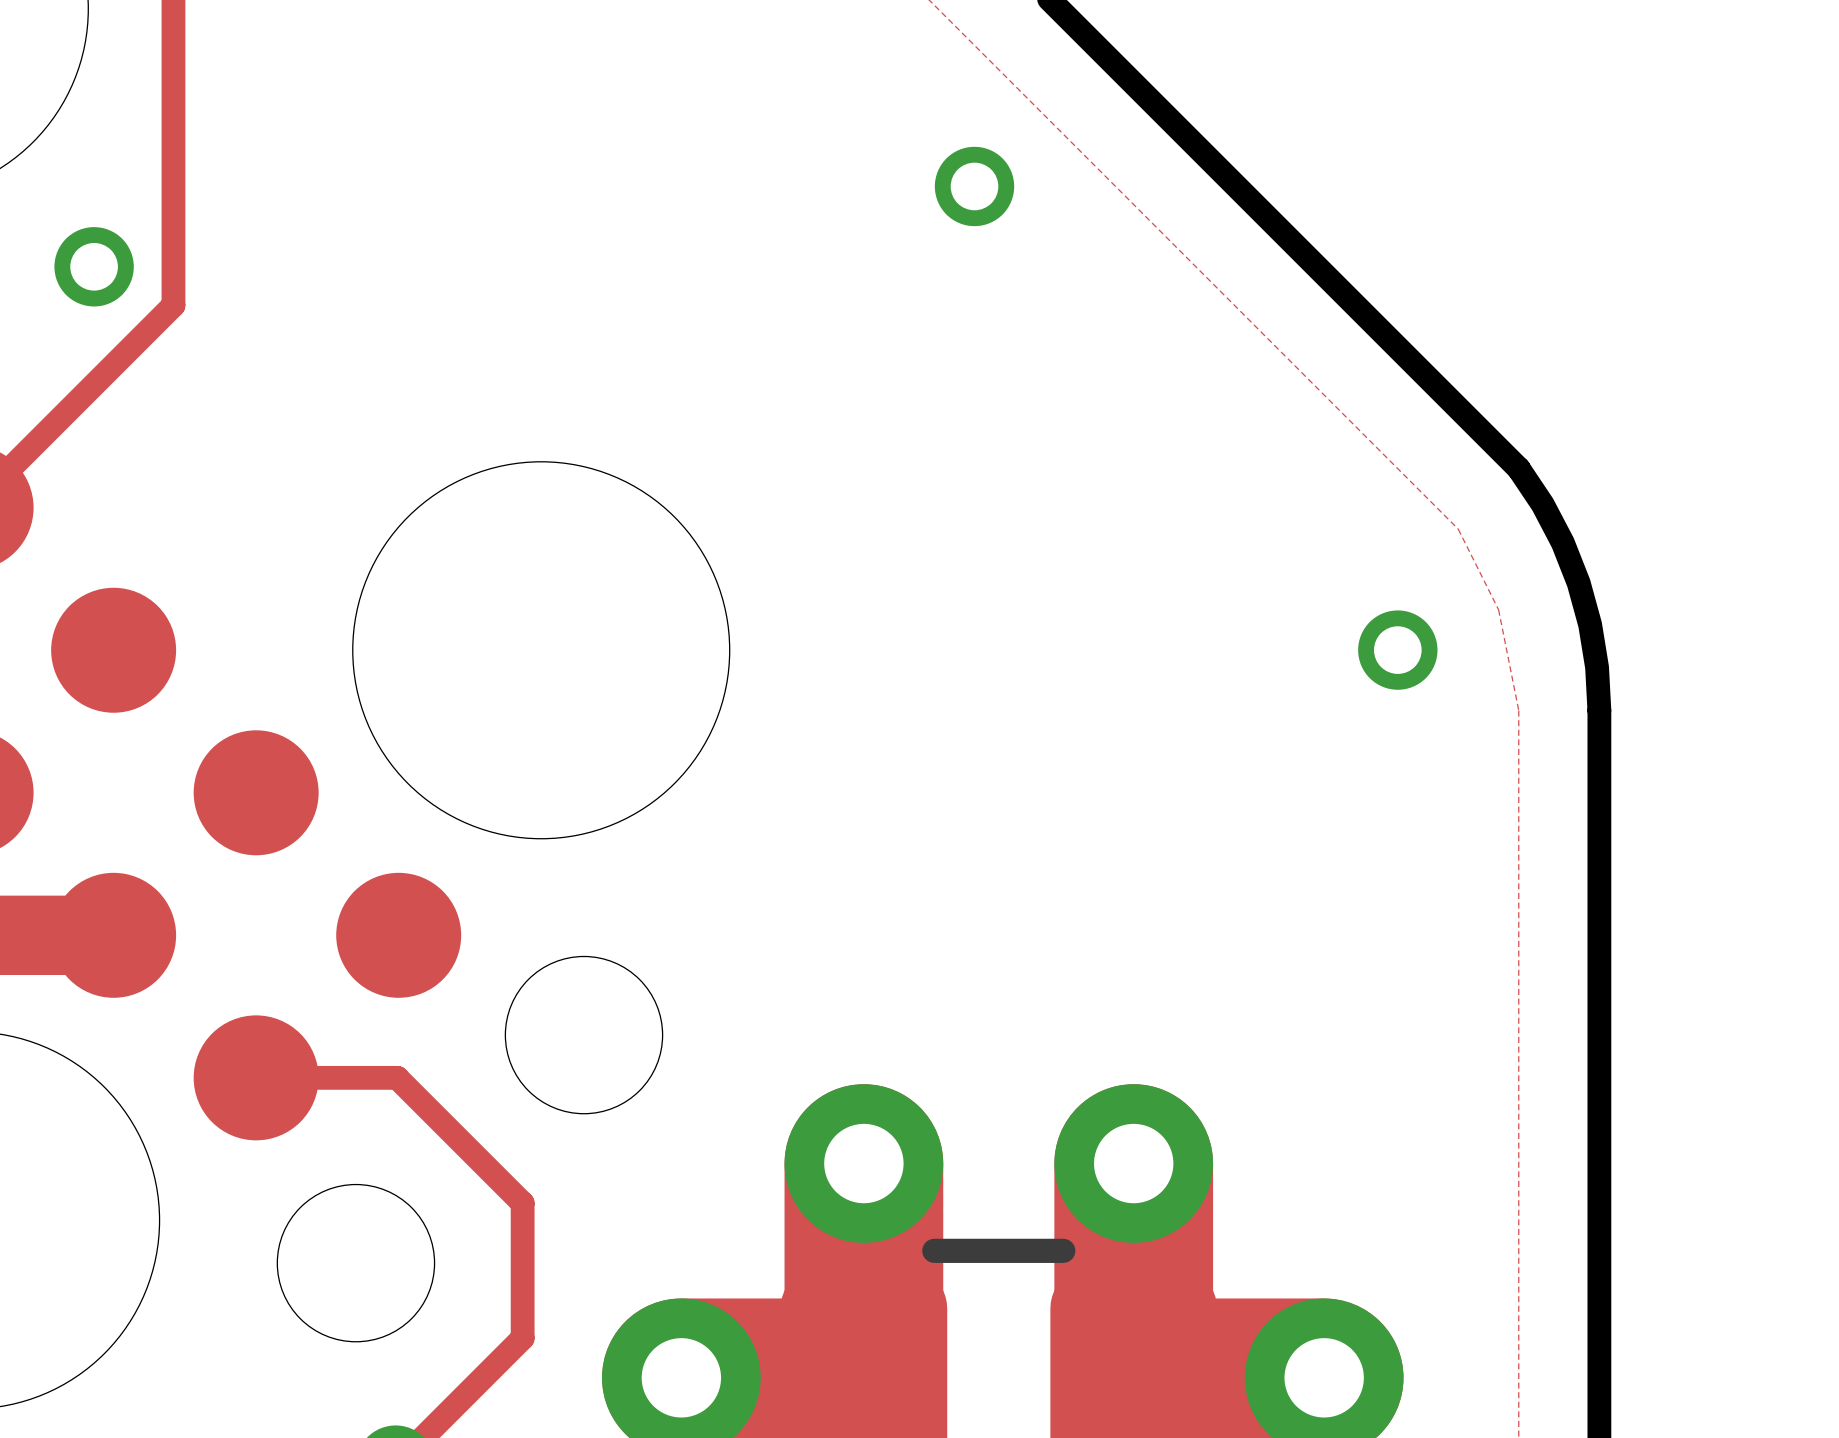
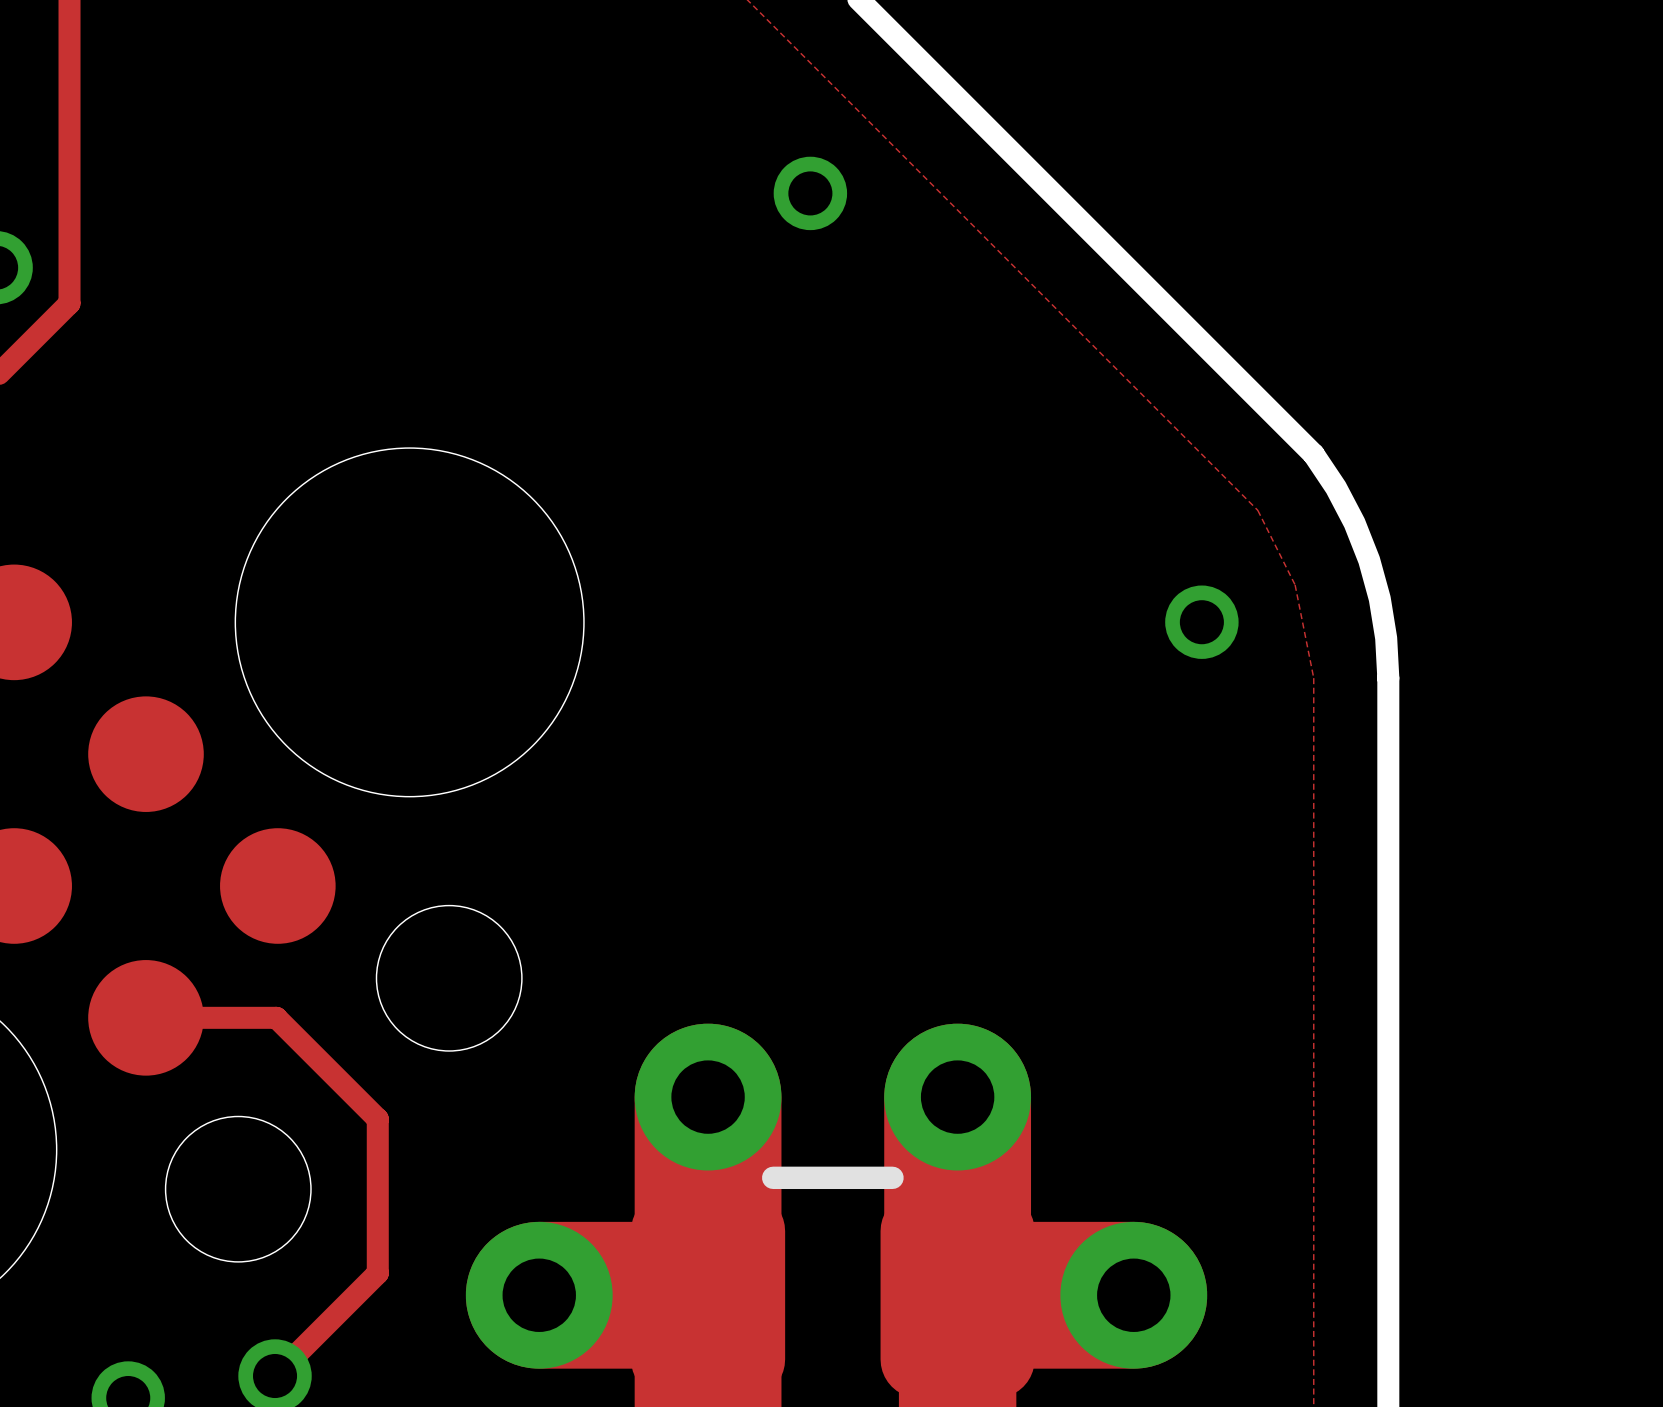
track: (506, 1187) (522, 1203) (522, 1338) (506, 1354) -> (377, 1119) (377, 1273)

